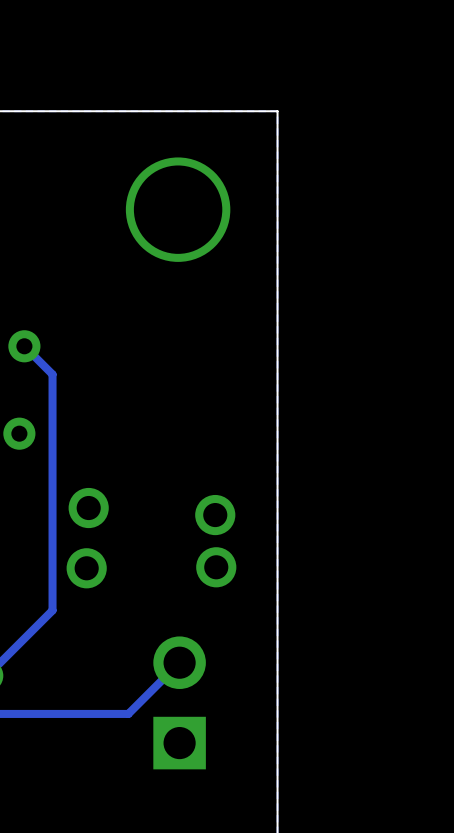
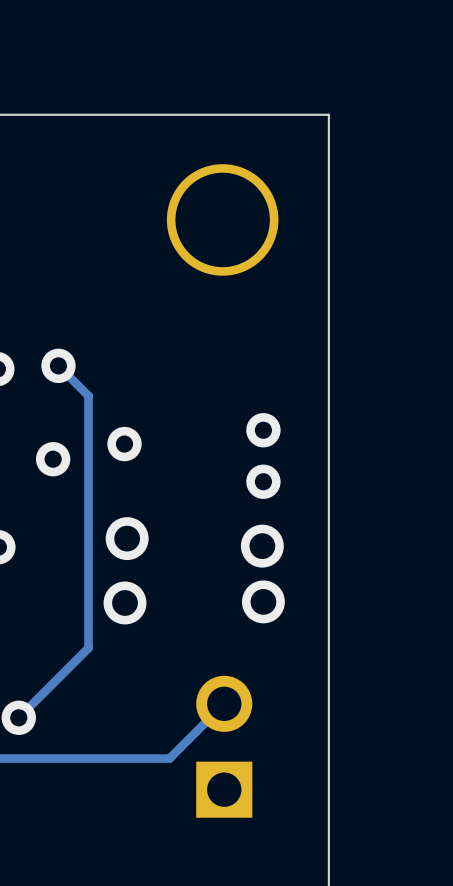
via: none -> (263, 430)
via: none -> (124, 444)
via: none -> (263, 481)

